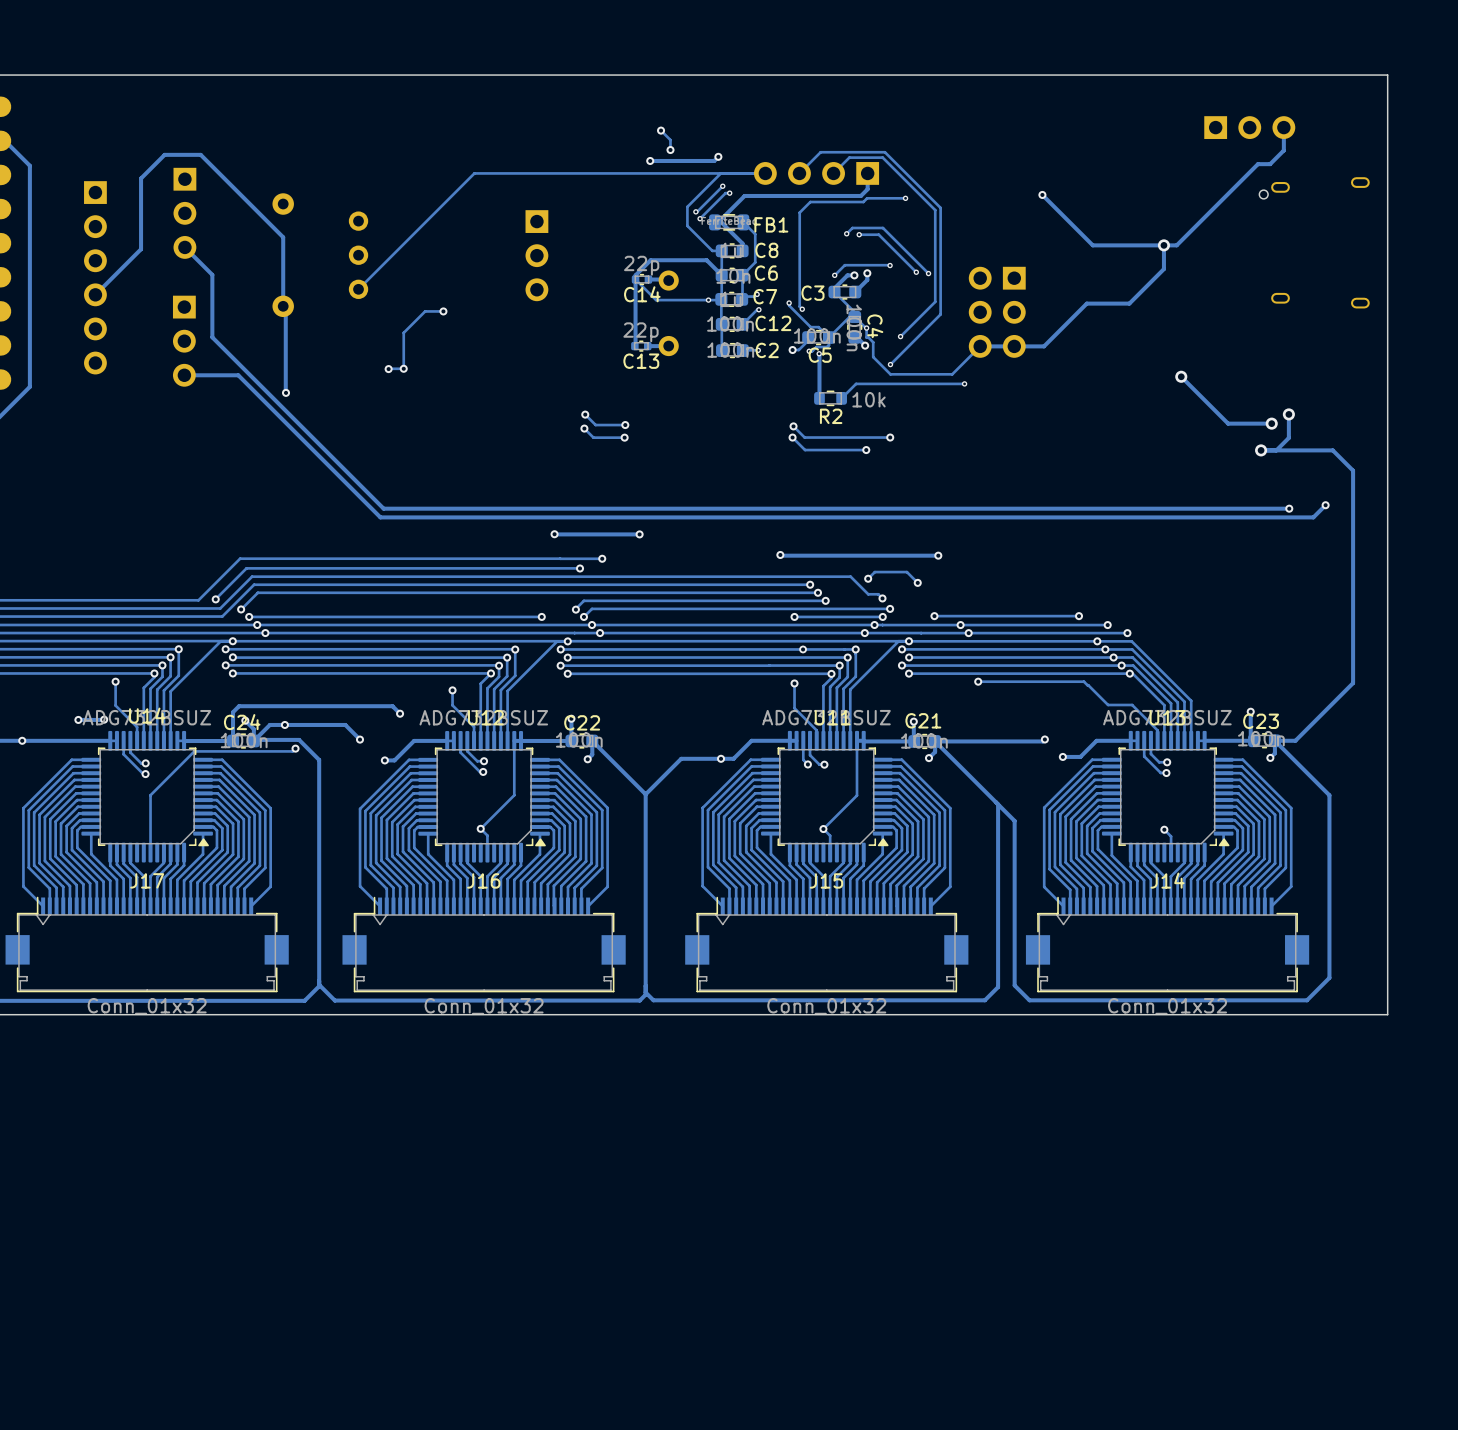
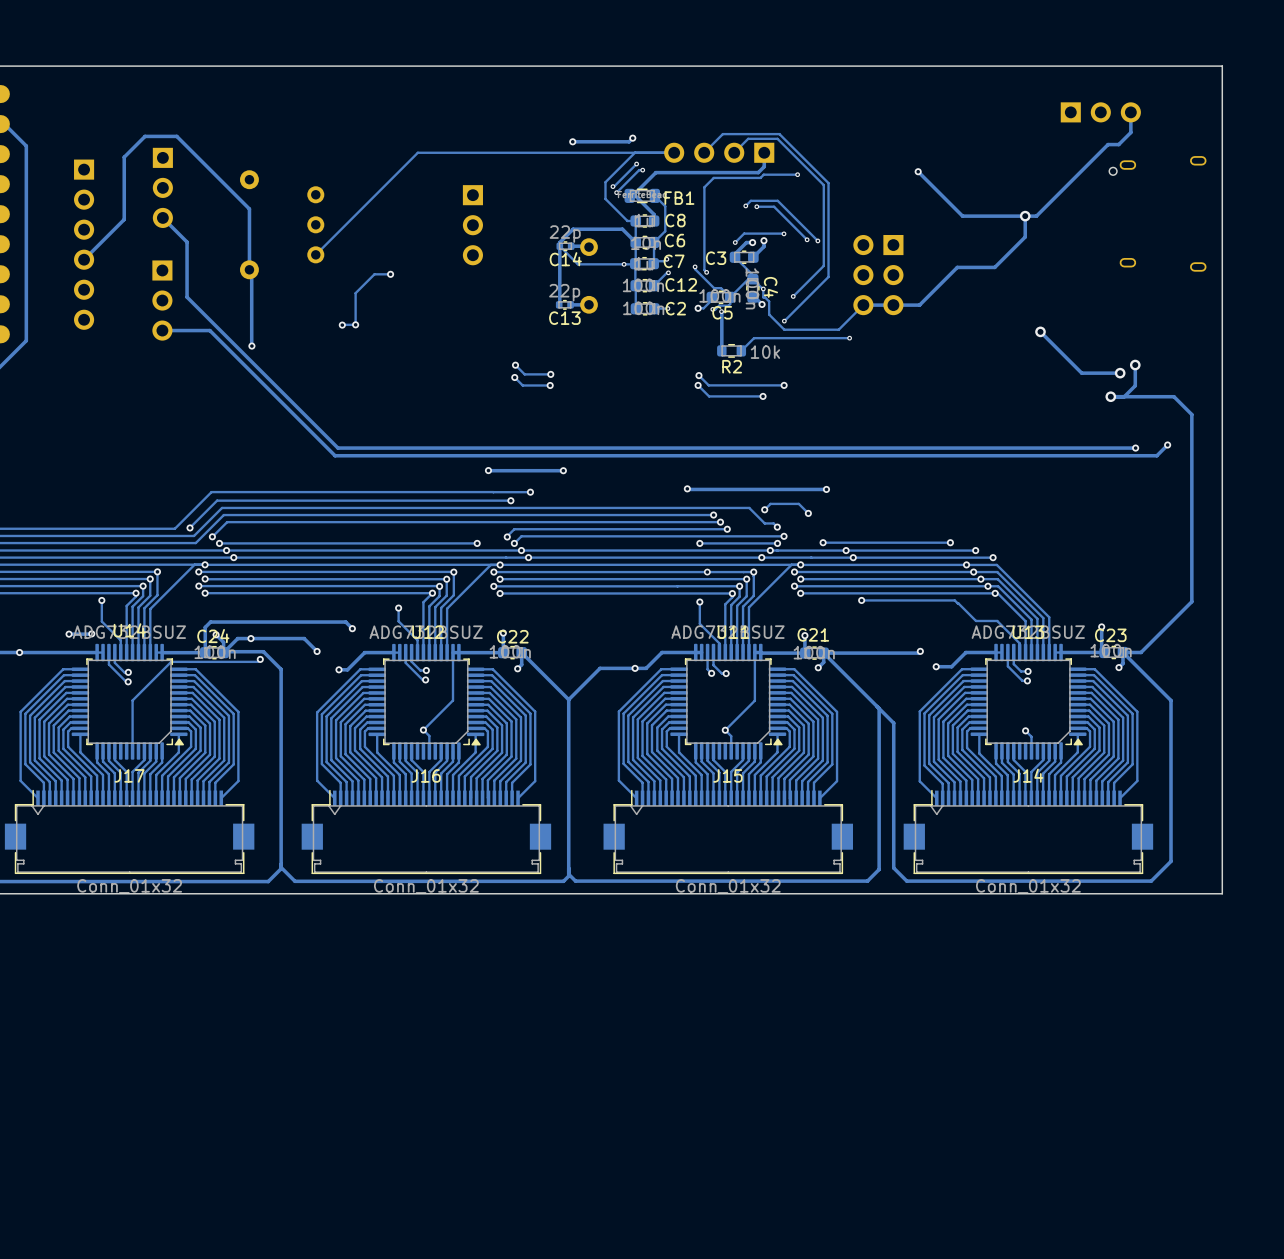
track: (661, 130) (670, 140) (670, 150) -> none
via: (661, 130) -> none
via: (670, 150) -> none

